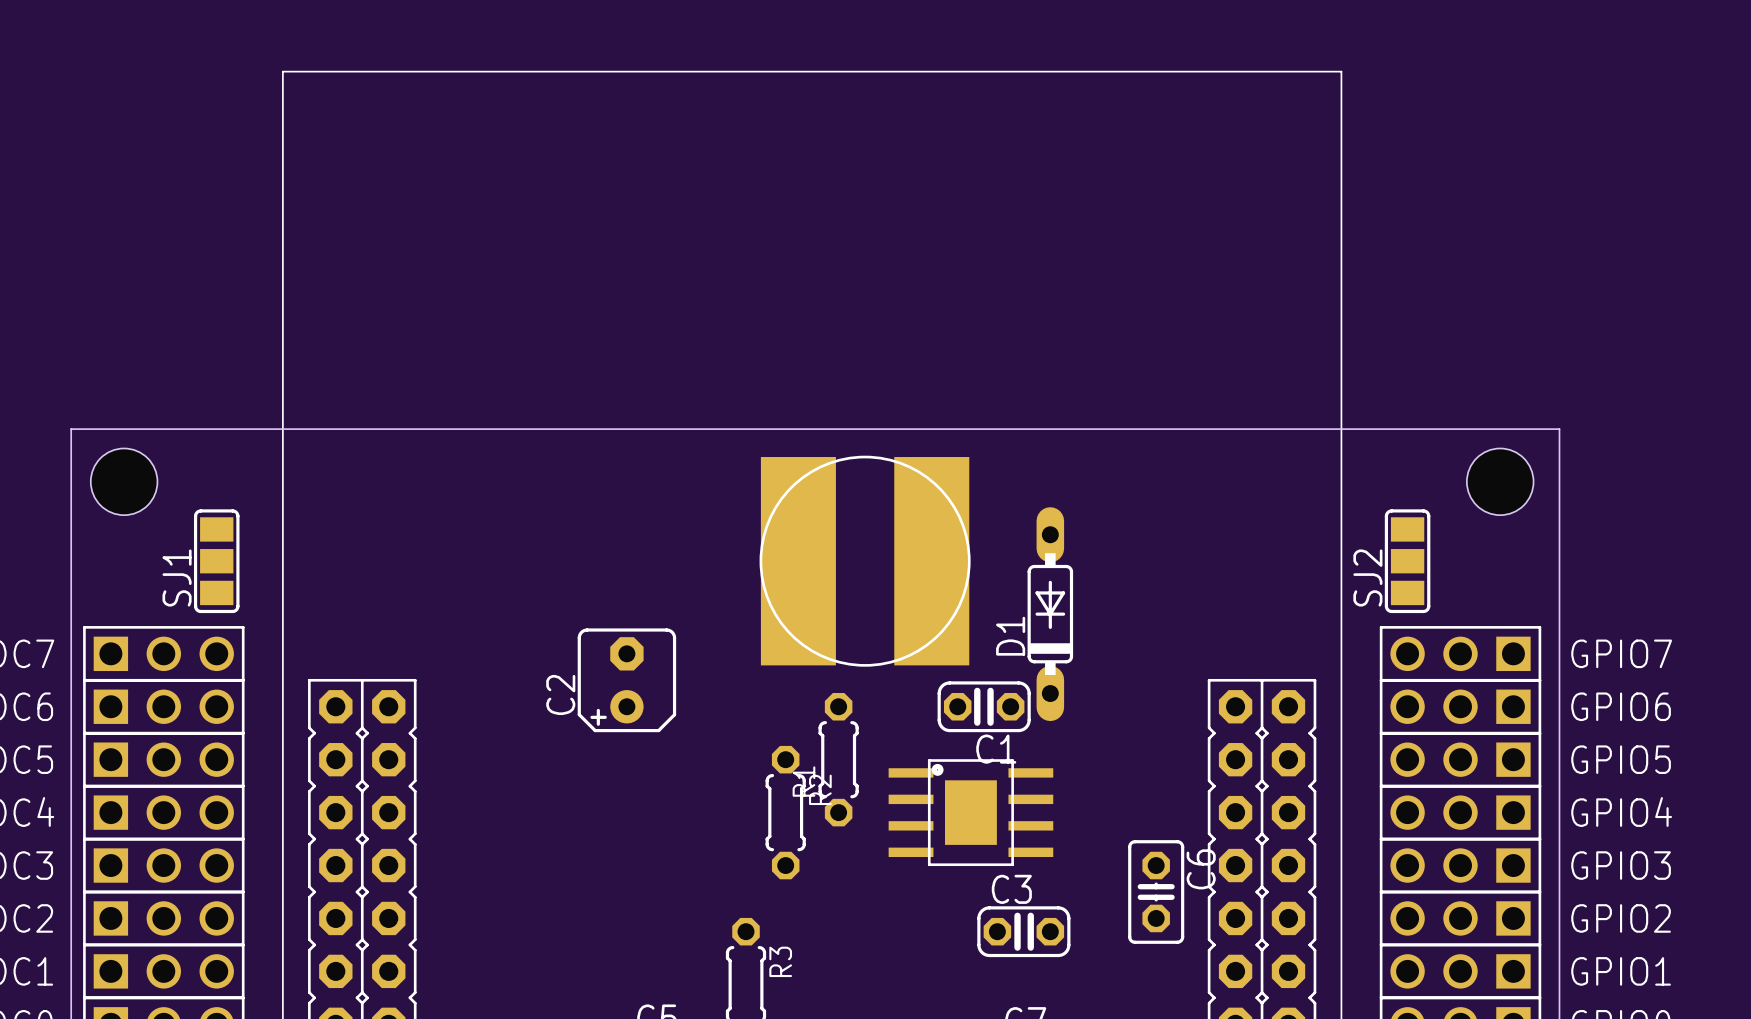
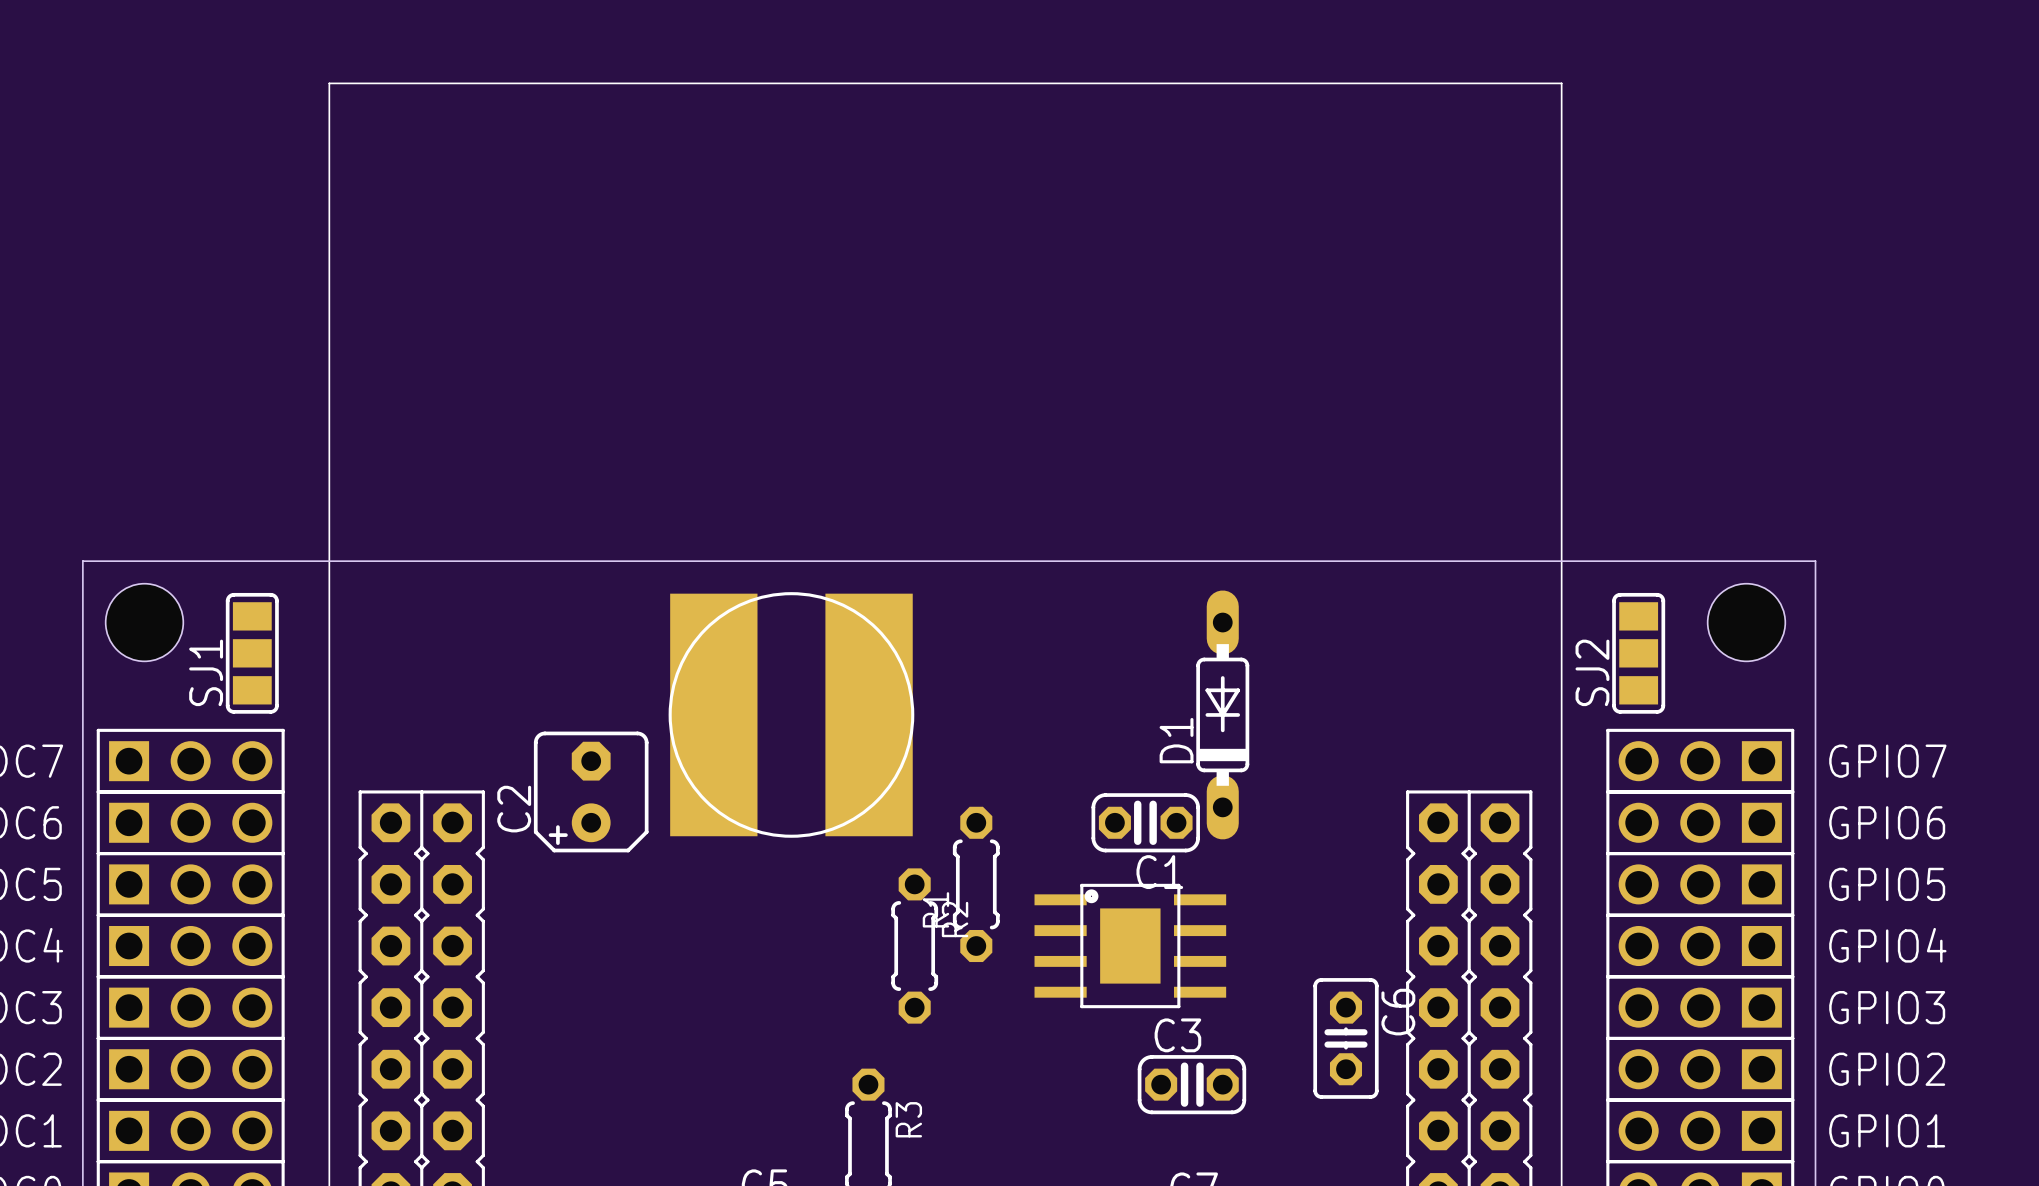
hole position: (124, 481) -> (144, 622)
hole position: (1500, 481) -> (1746, 622)
board edge: (71, 482) (71, 429) (1559, 429) (1559, 482) -> (82, 561) (1815, 561)
part position: (865, 561) -> (791, 714)
C2 position: (626, 680) -> (591, 791)

